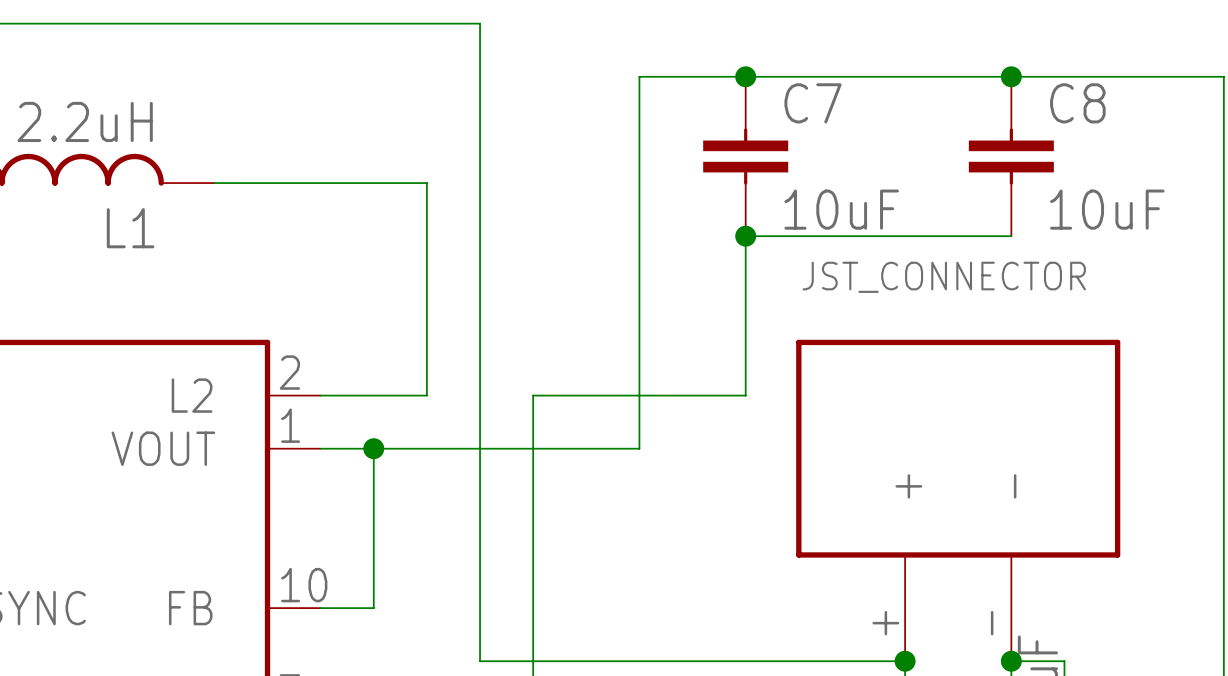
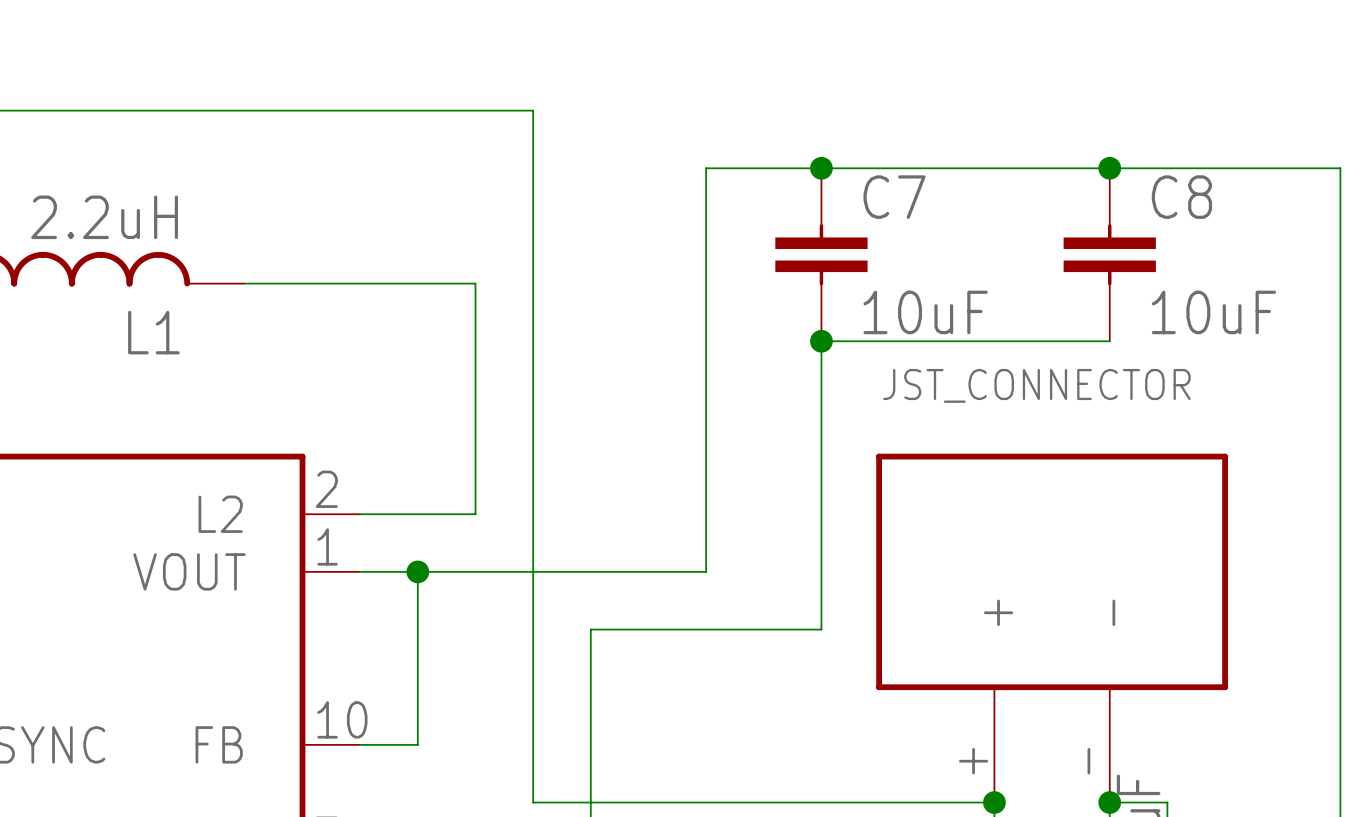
wire: (745, 395) (533, 395) (533, 501) -> (821, 514) (821, 629) (590, 629)

